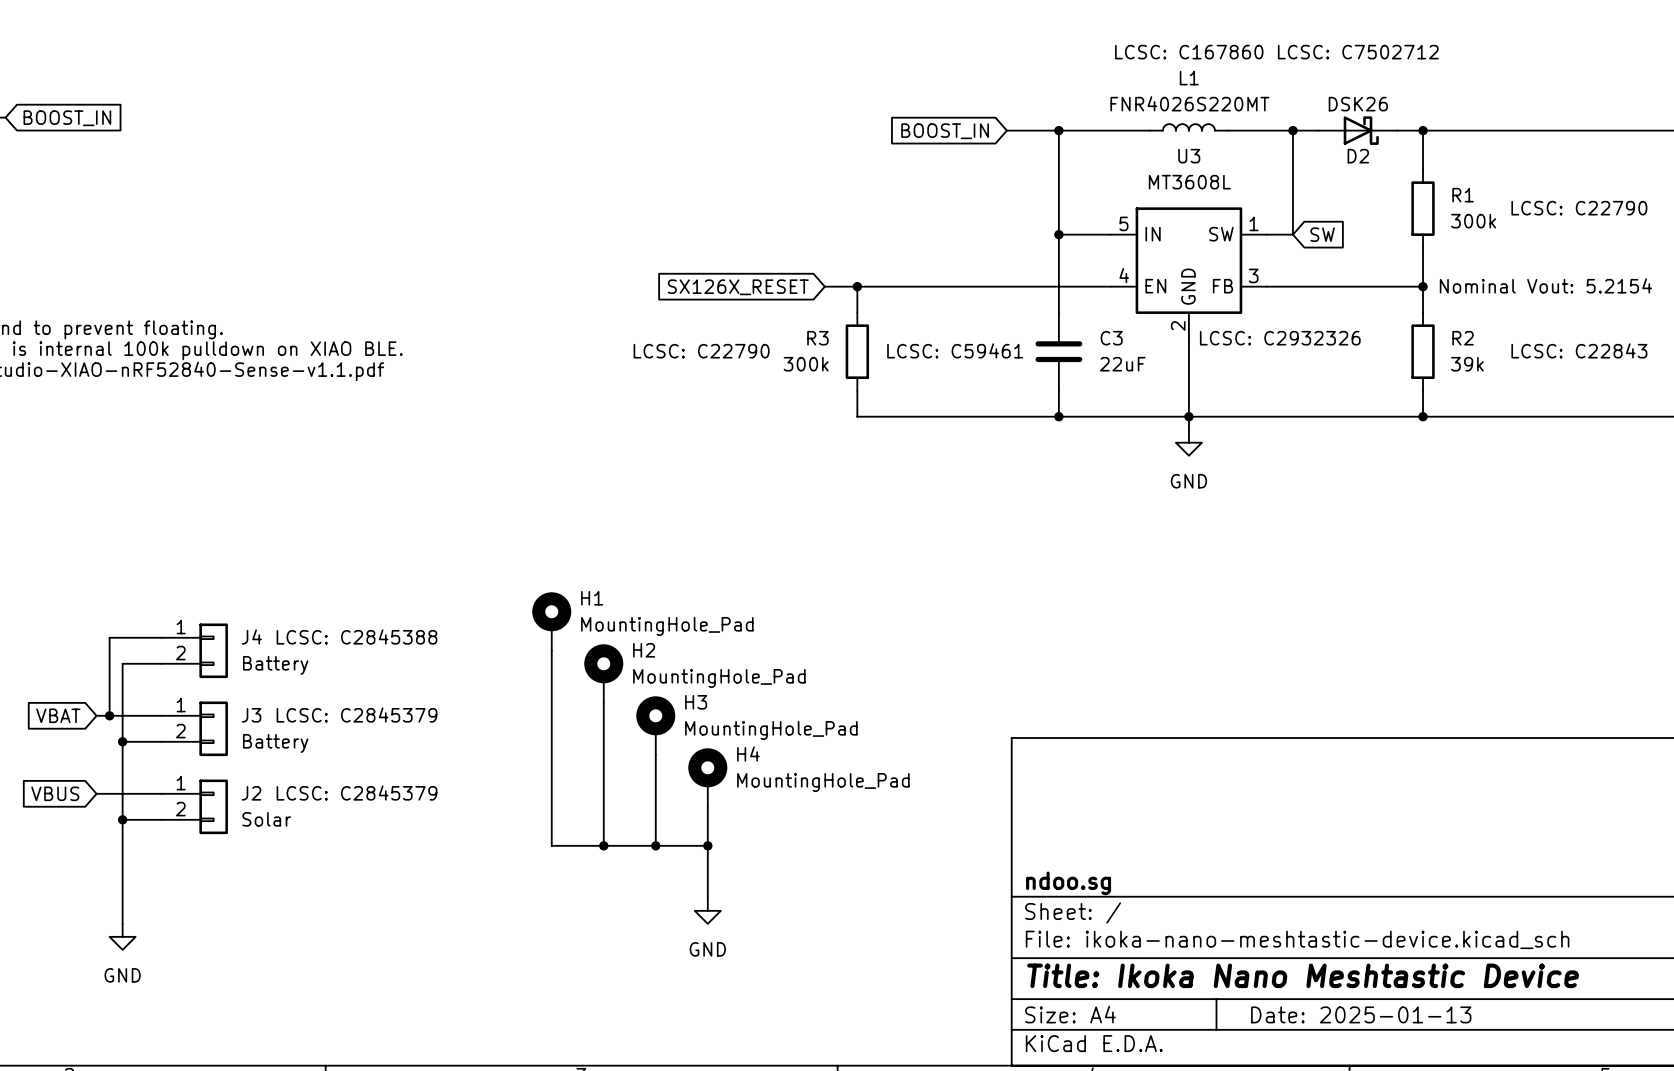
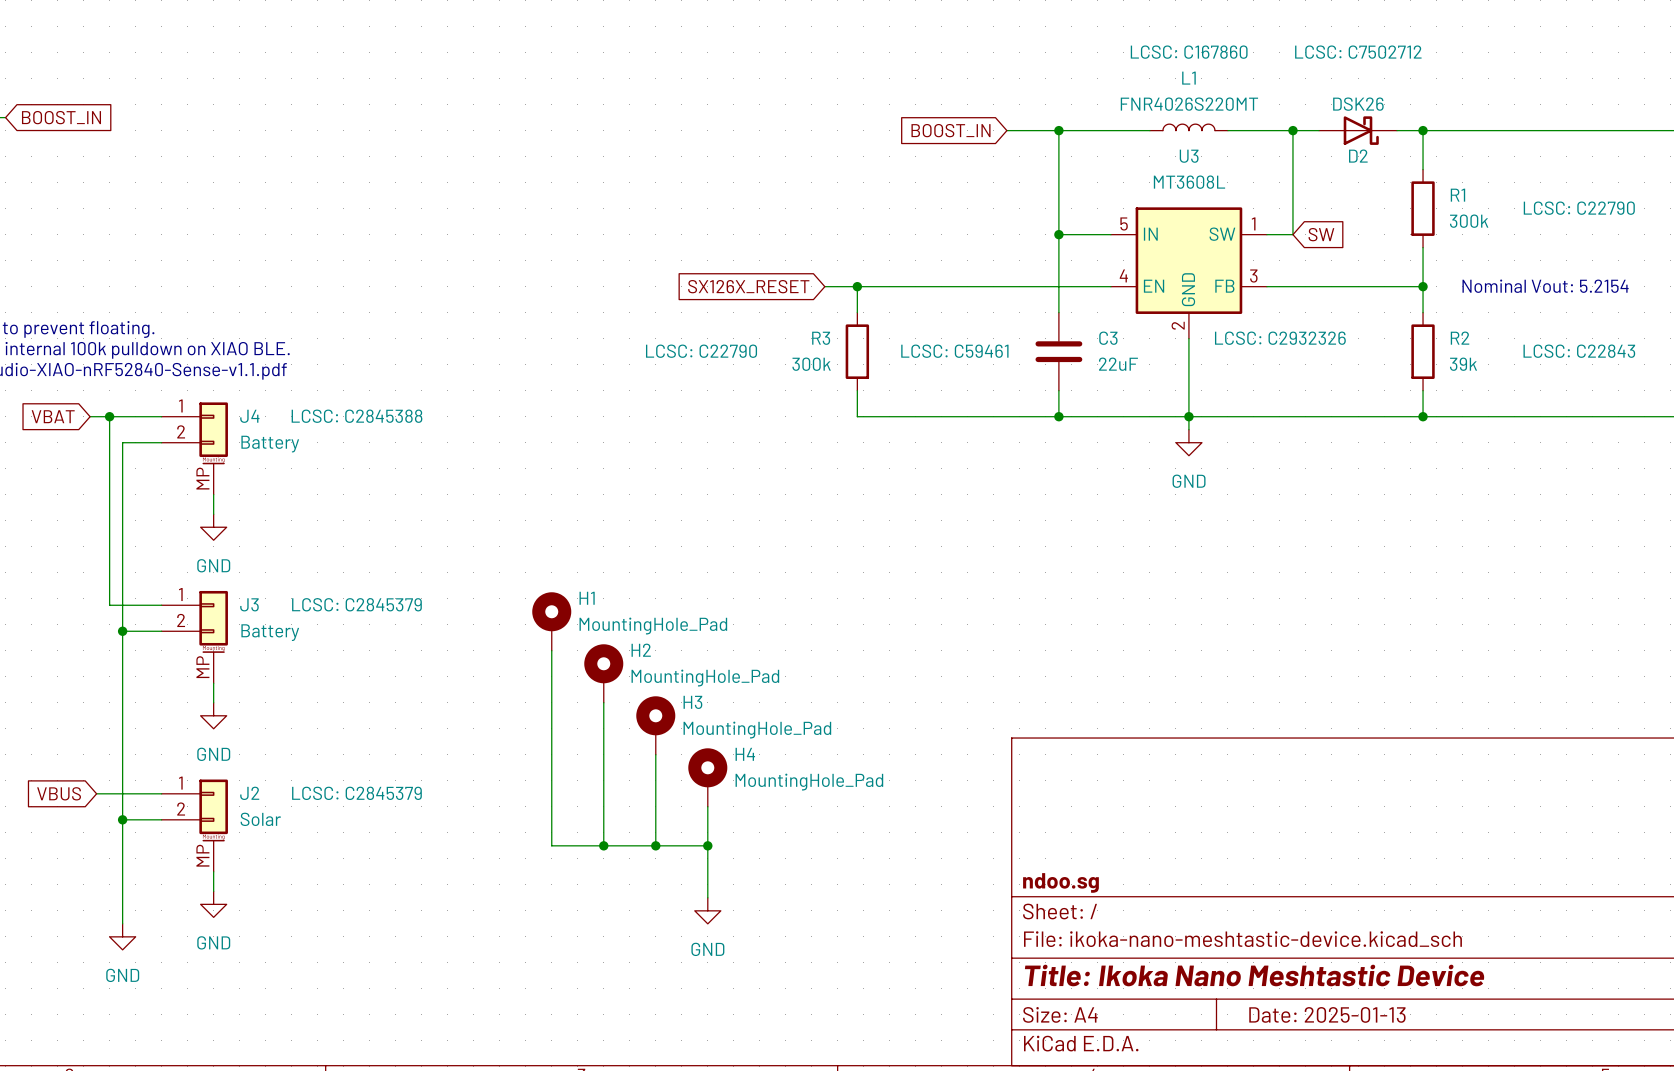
global label: none -> VBAT (53, 416)
wire: none -> (90, 416) (161, 416)
wire: none -> (109, 416) (109, 605) (161, 605)
junction: none -> (109, 416)
wire: none -> (213, 494) (213, 514)
power symbol: none -> GND (213, 527)
J4 symbol: [161, 623, 228, 679] -> [161, 402, 228, 495]
junction: none -> (122, 631)
wire: (161, 637) (109, 637) (109, 715) -> none
wire: (122, 663) (161, 663) -> (122, 663) (122, 442) (161, 442)
wire: none -> (213, 683) (213, 702)
J3 symbol: [161, 701, 228, 757] -> [161, 590, 228, 684]
global label: VBAT (58, 715) -> none
wire: (96, 715) (161, 715) -> none
junction: (109, 715) -> none
power symbol: none -> GND (213, 715)
wire: (122, 741) (161, 741) -> (122, 631) (161, 631)
junction: (122, 741) -> none
J2 symbol: [161, 779, 228, 835] -> [161, 779, 228, 872]
wire: none -> (213, 871) (213, 891)
power symbol: none -> GND (213, 904)

